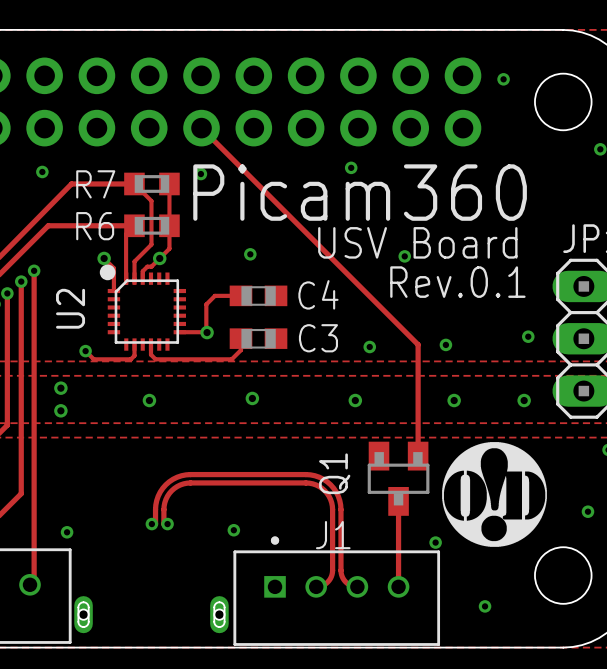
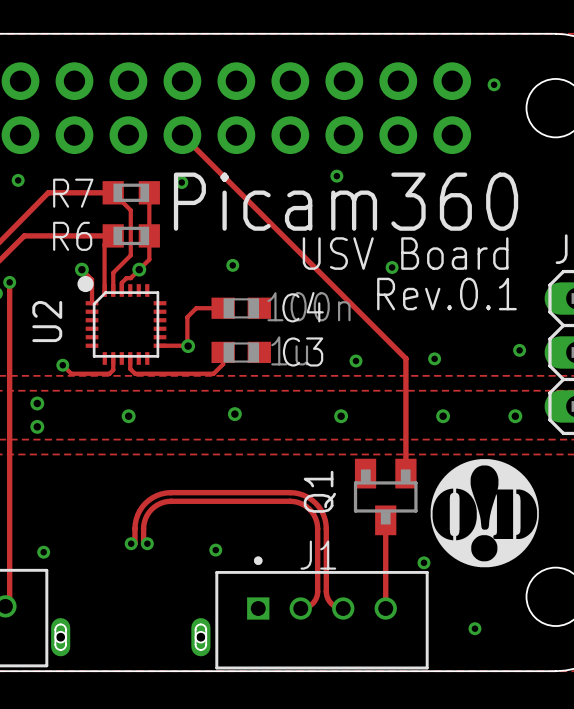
C4 value: none -> 100n (309, 306)
C3 value: none -> 1u (289, 350)

